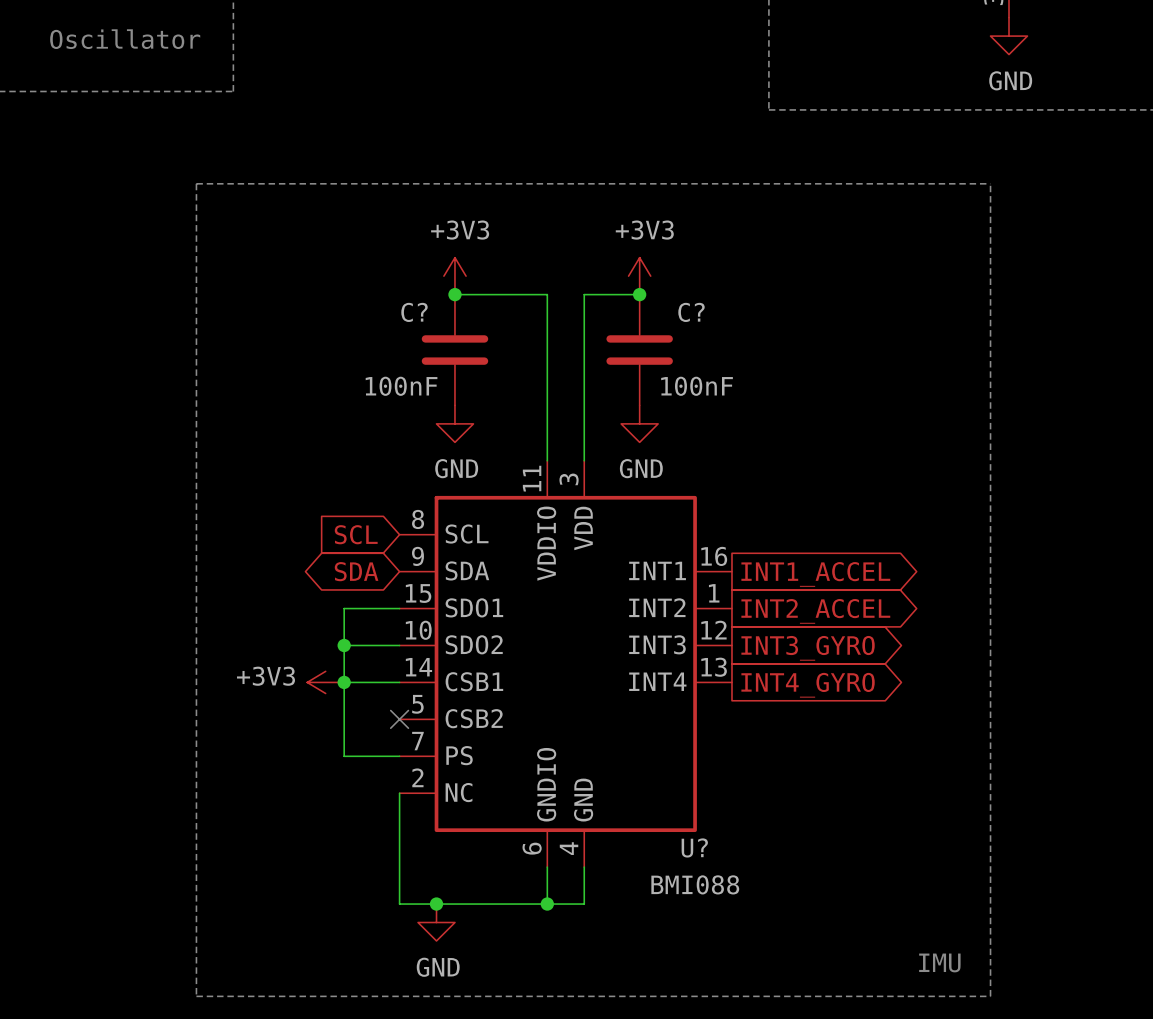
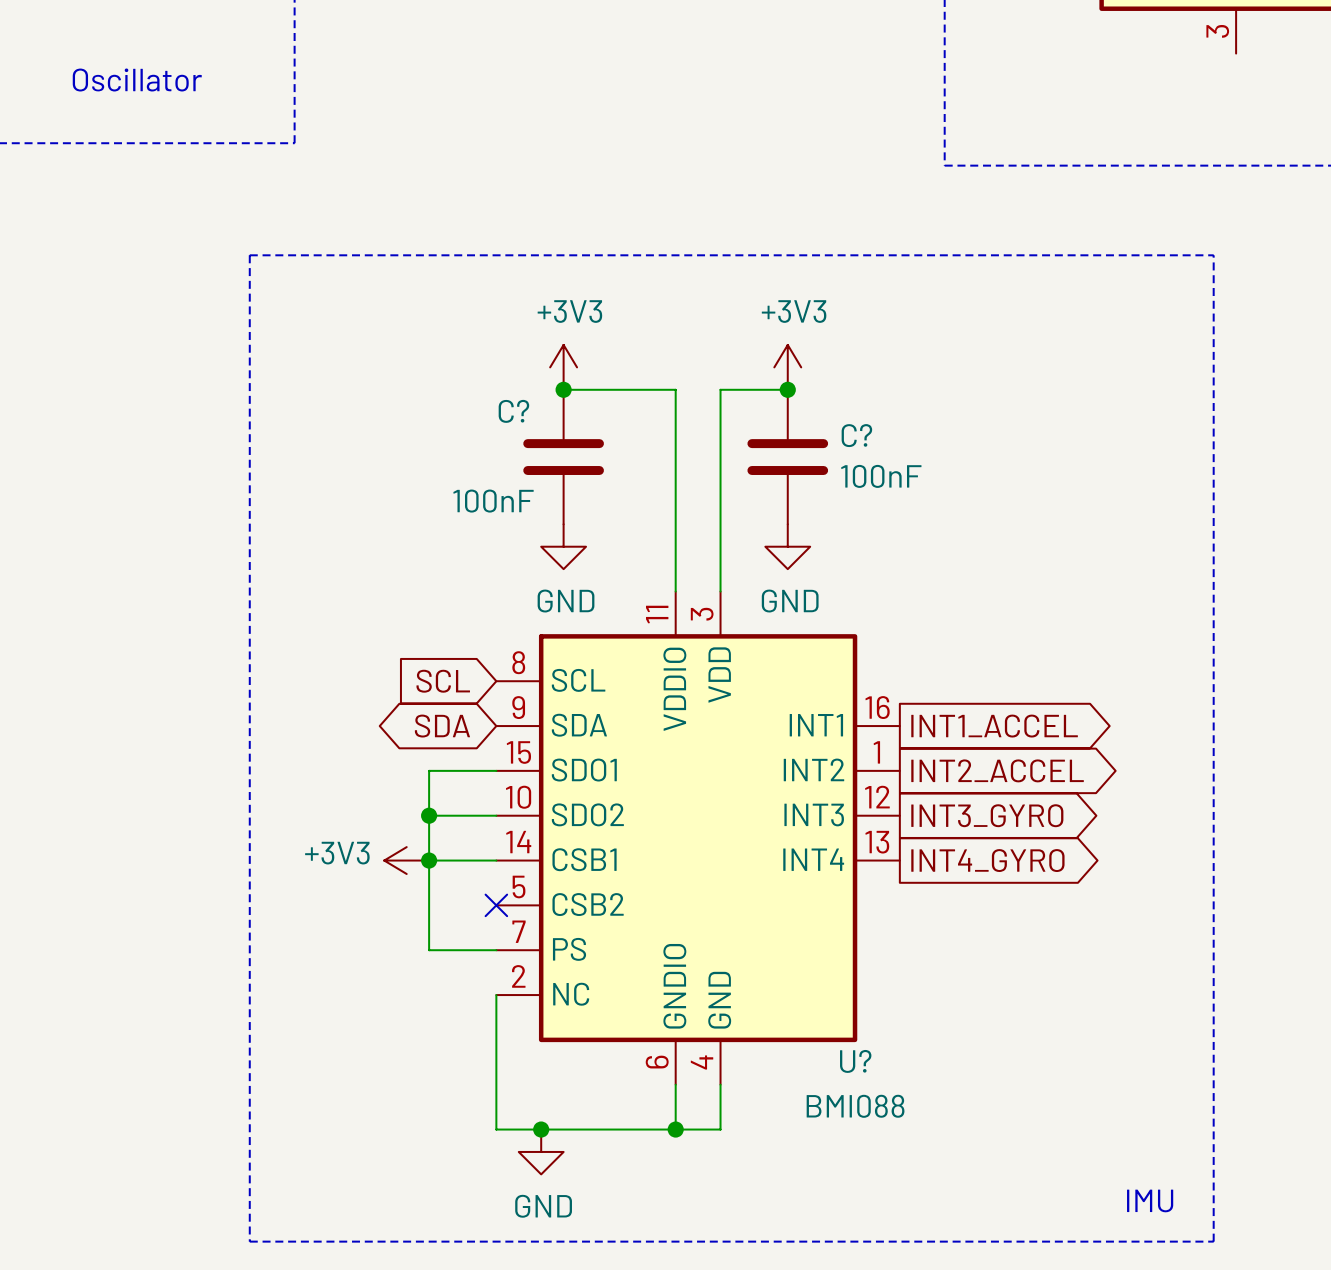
power symbol: GND (1009, 36) -> none
C? name position: C? (691, 312) -> C? (856, 435)
C? value position: 100nF (697, 386) -> 100nF (881, 476)

